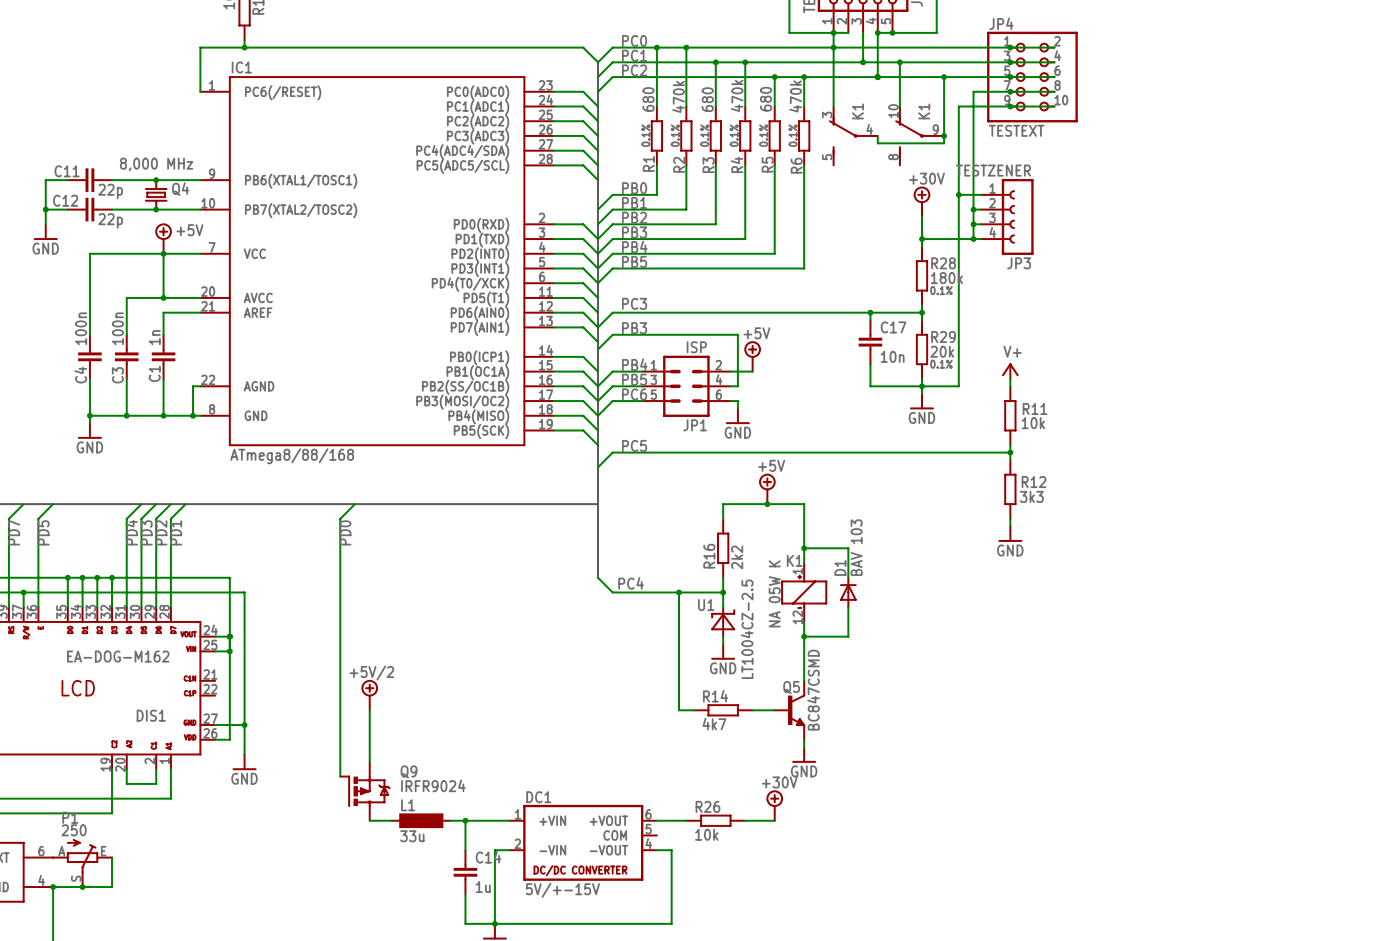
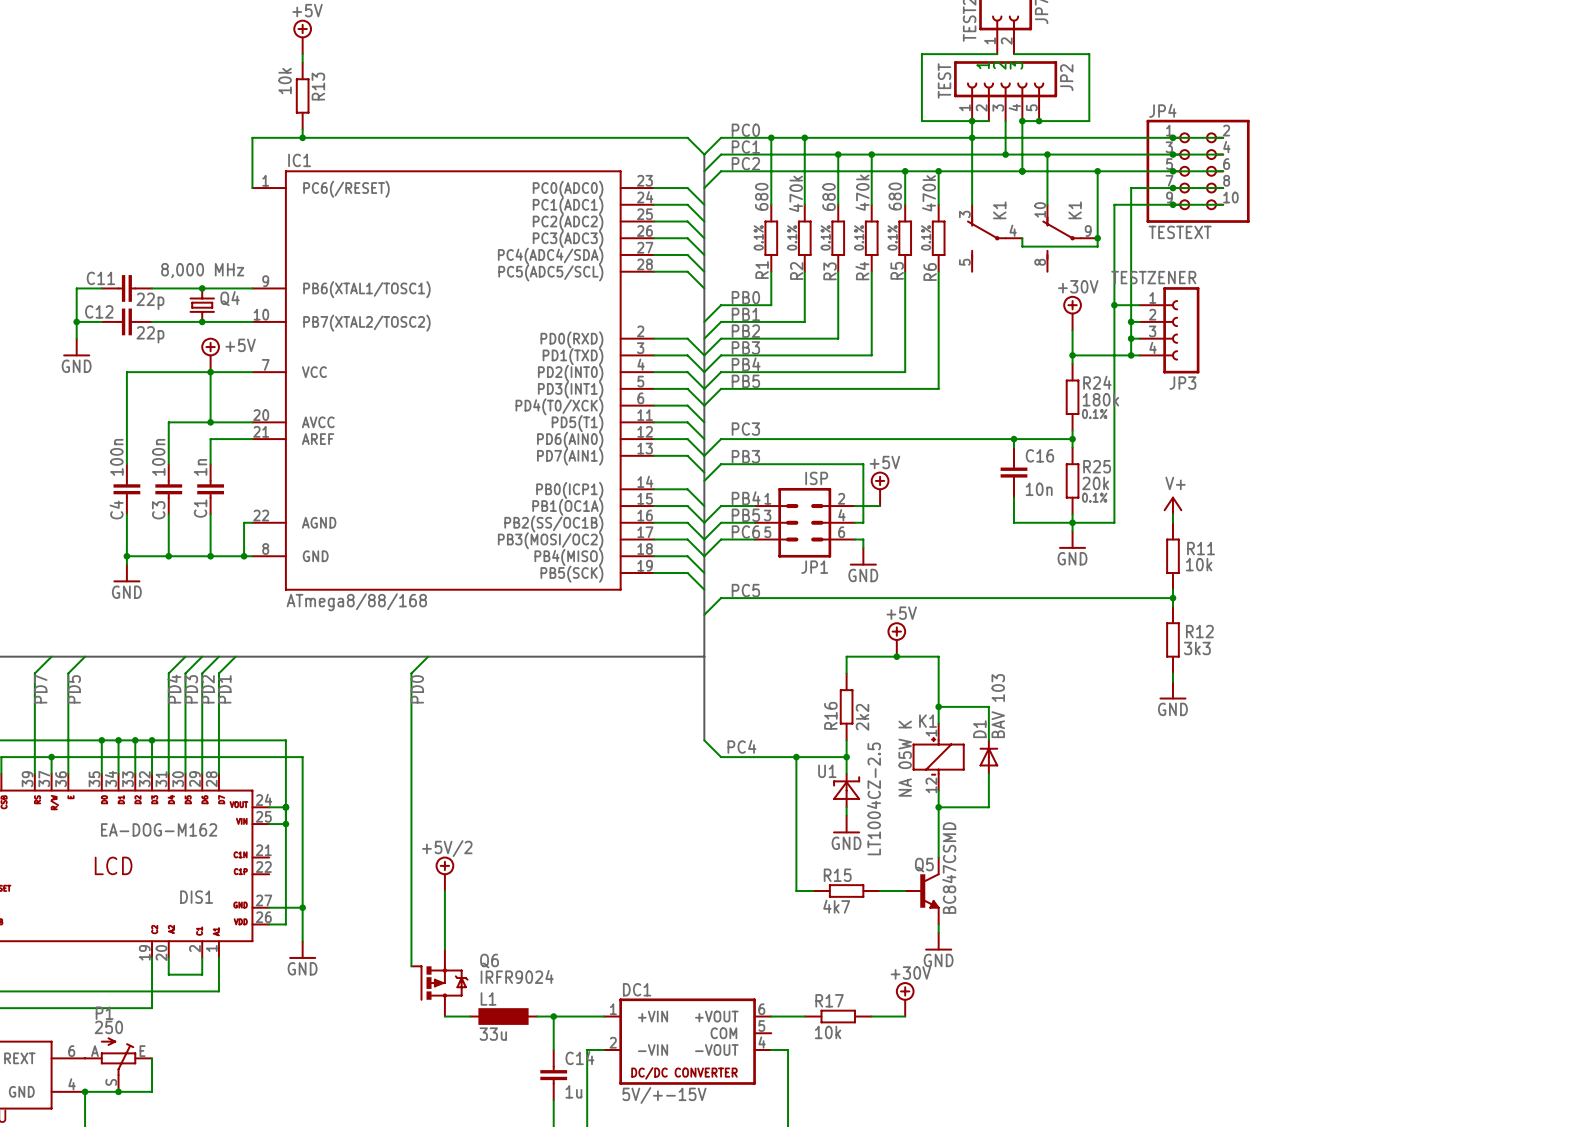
R28 name: R28 (943, 263) -> R24 (1097, 382)
C17 name: C17 (893, 327) -> C16 (1039, 455)
R29 name: R29 (943, 336) -> R25 (1097, 466)
R14 name: R14 (715, 696) -> R15 (837, 875)
Q9 name: Q9 (409, 771) -> Q6 (489, 961)
R26 name: R26 (707, 806) -> R17 (829, 1000)

